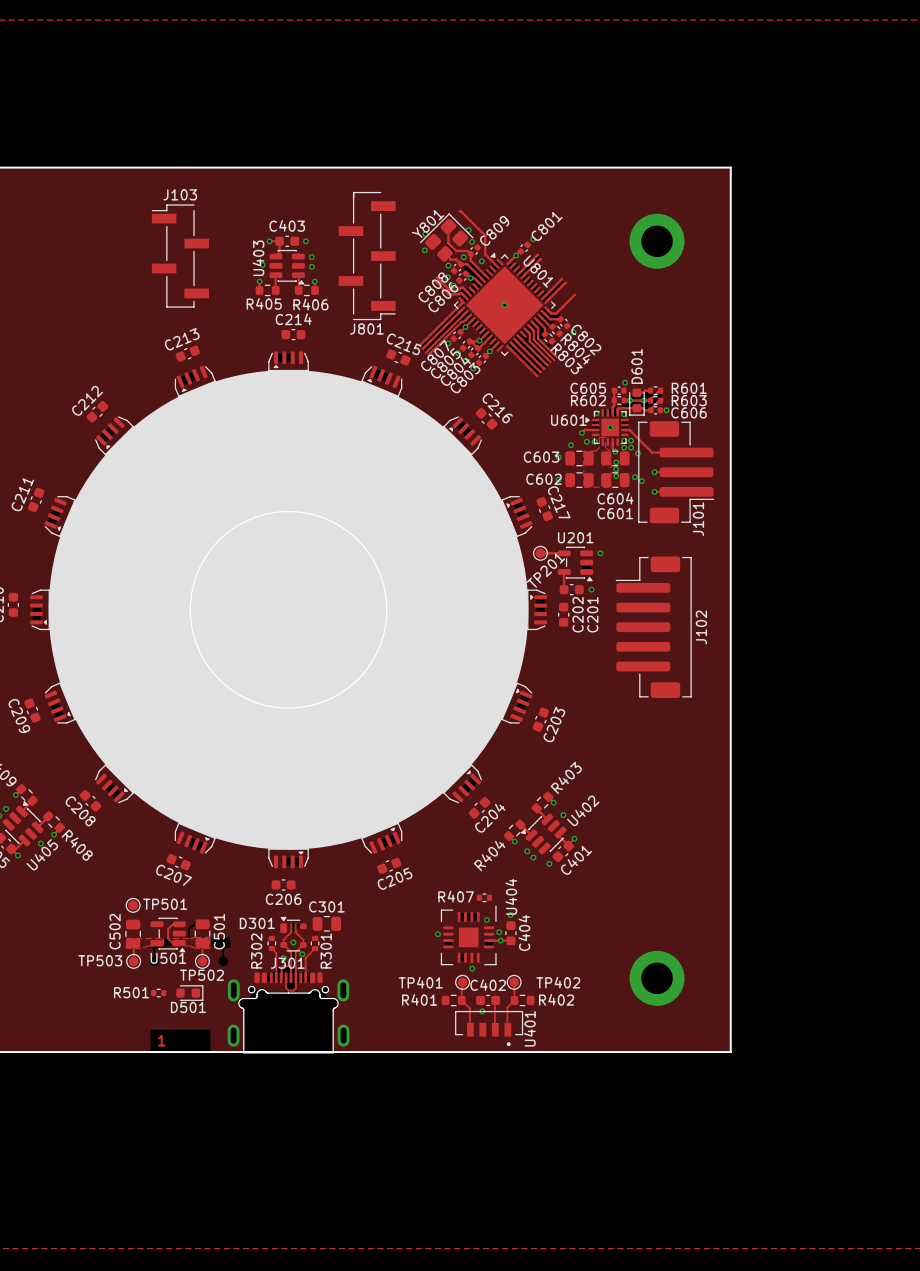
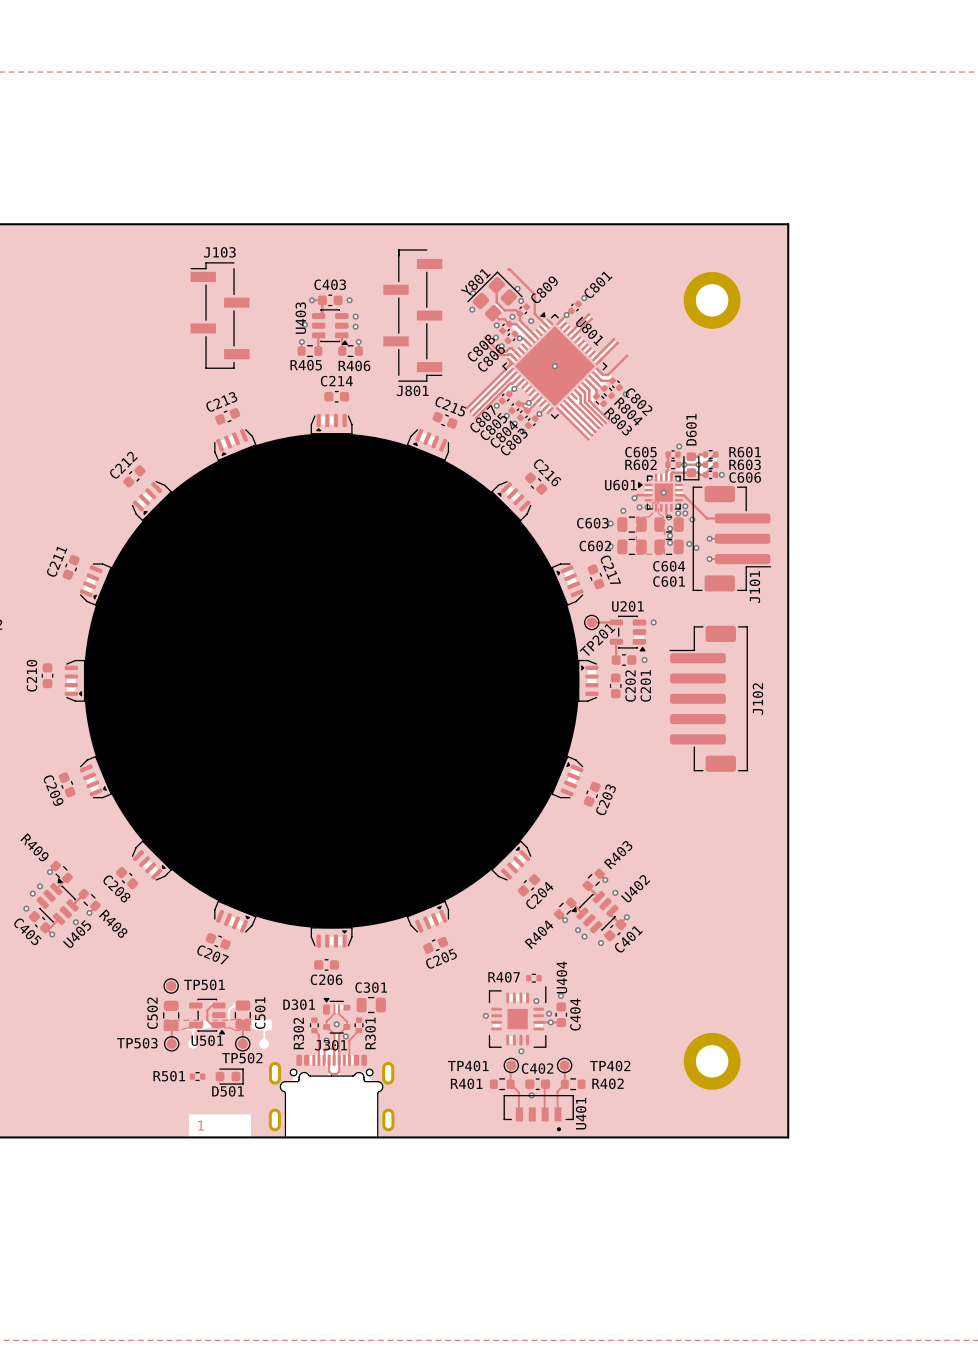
J301 footprint: [227, 972, 350, 1054] -> [268, 1054, 395, 1139]

